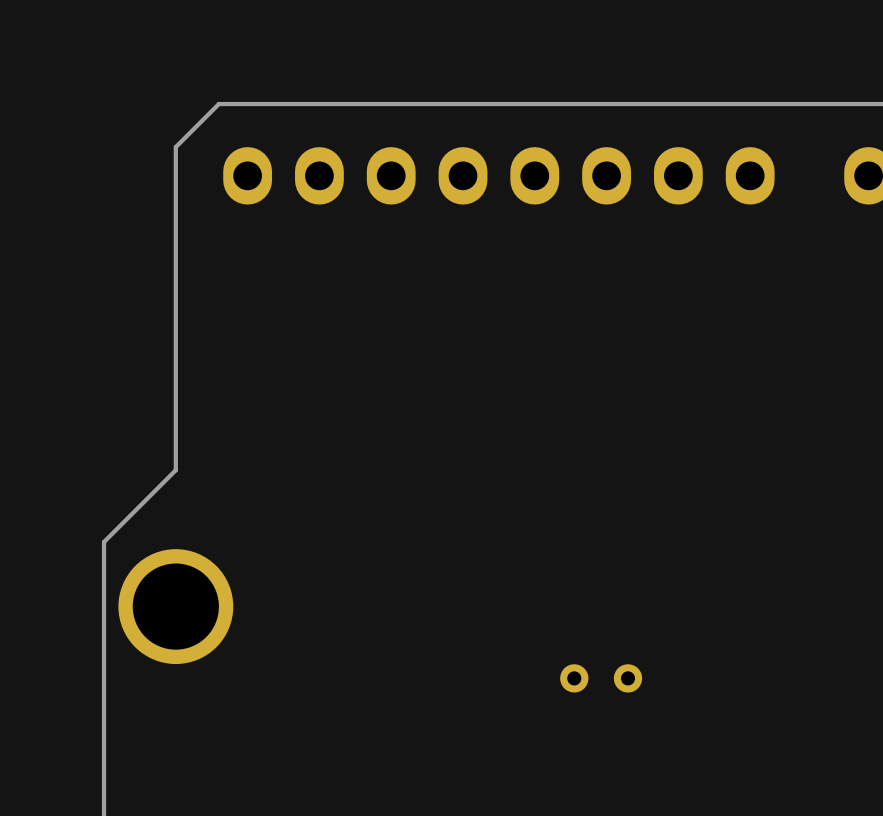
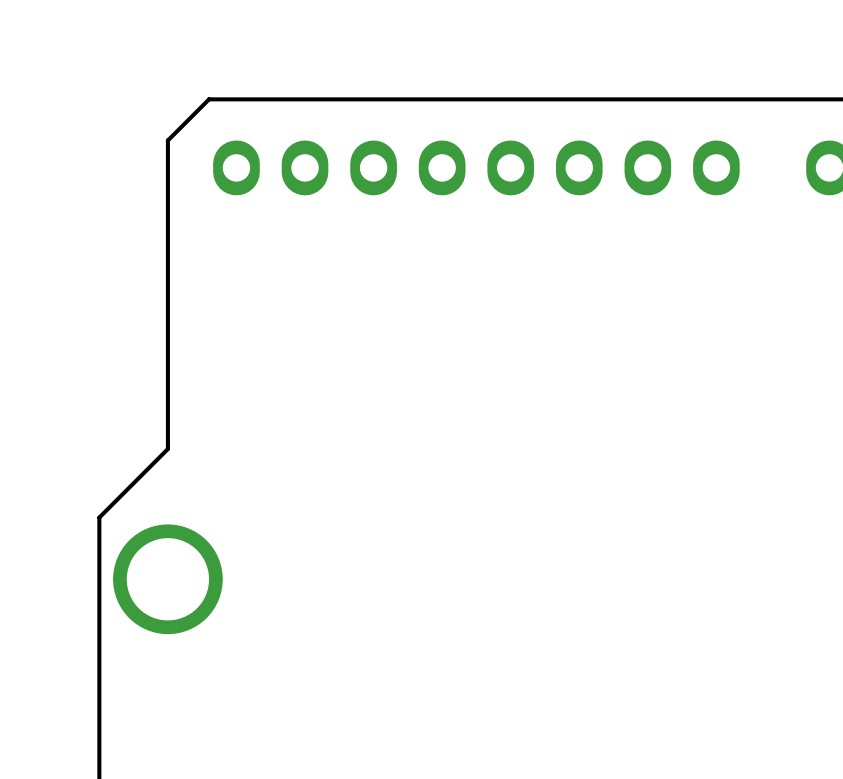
part: (601, 678) -> none

